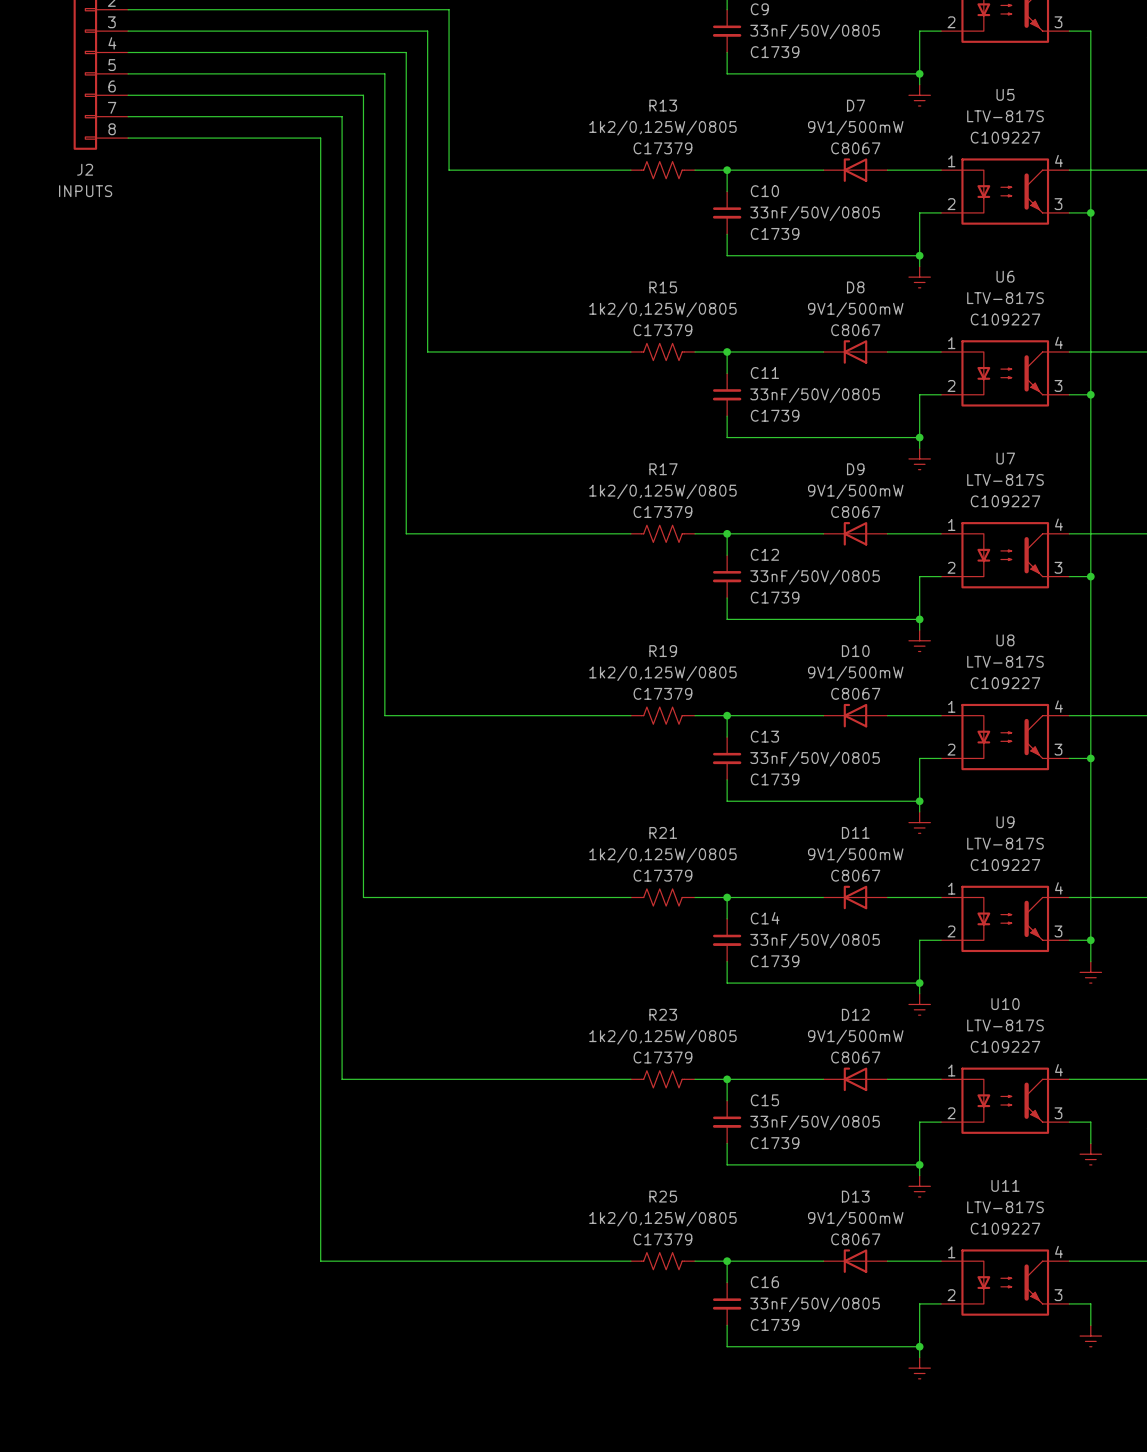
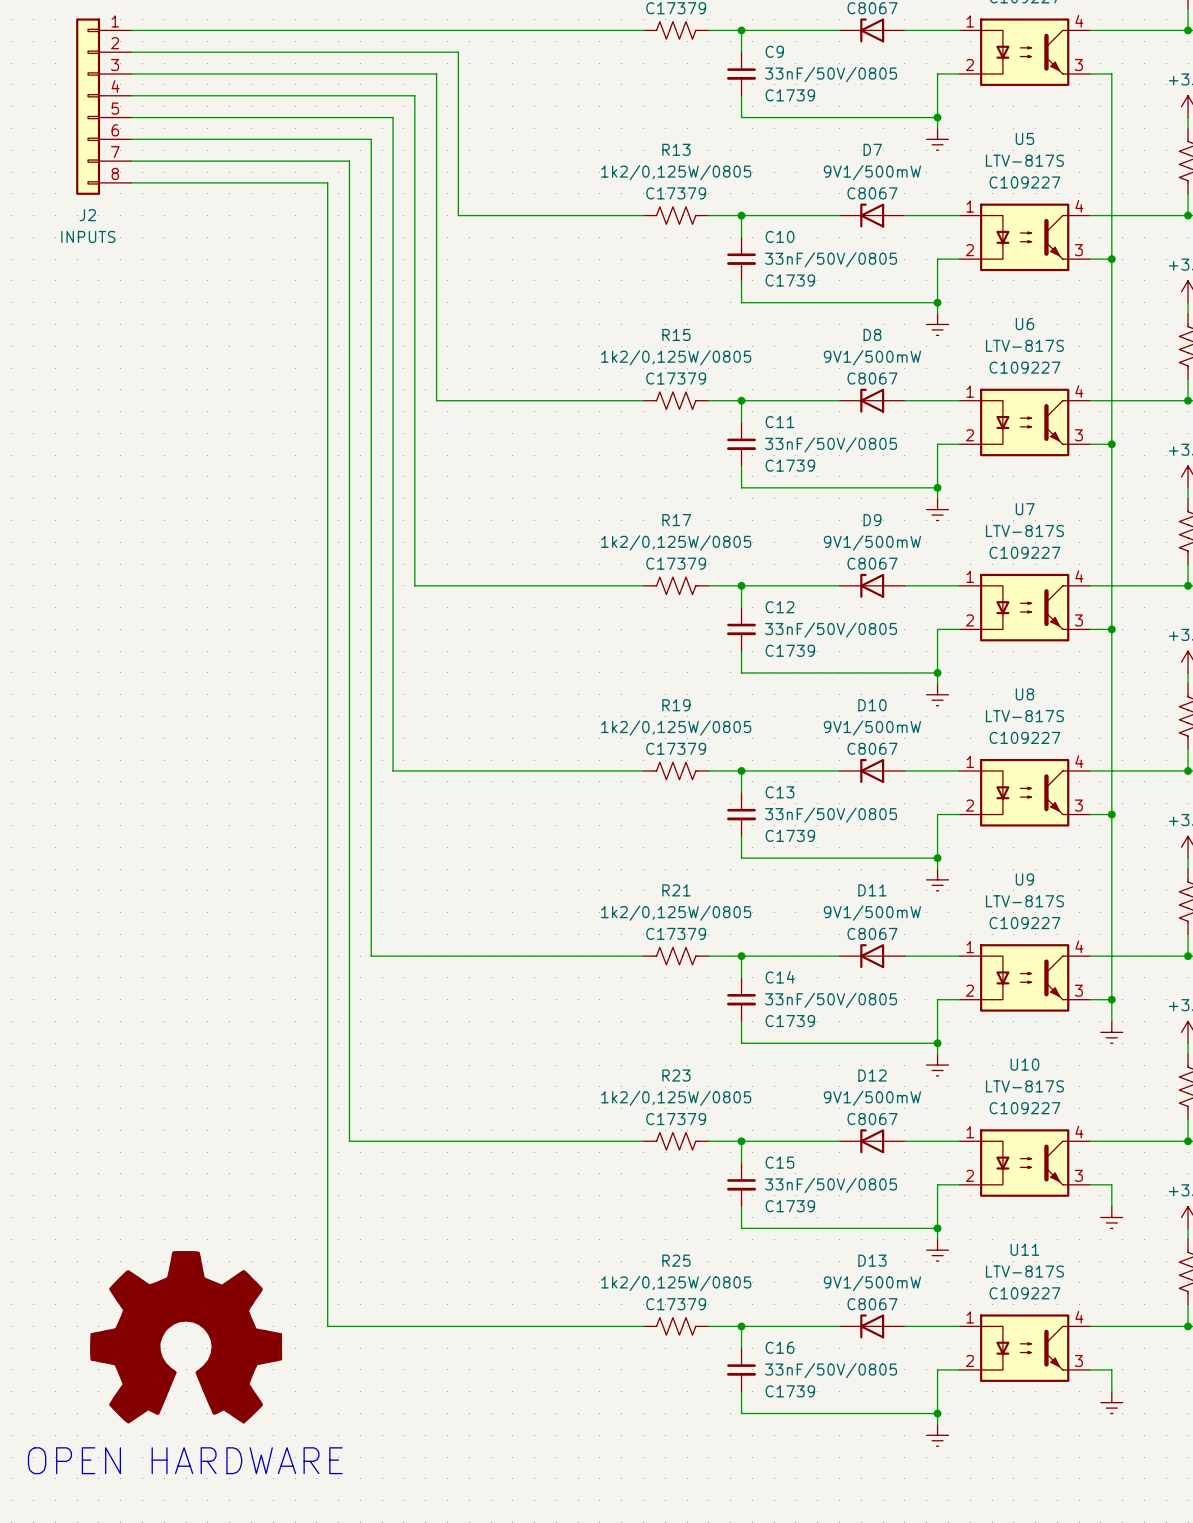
part: none -> (186, 1337)
text: none -> OPEN HARDWARE (185, 1460)

